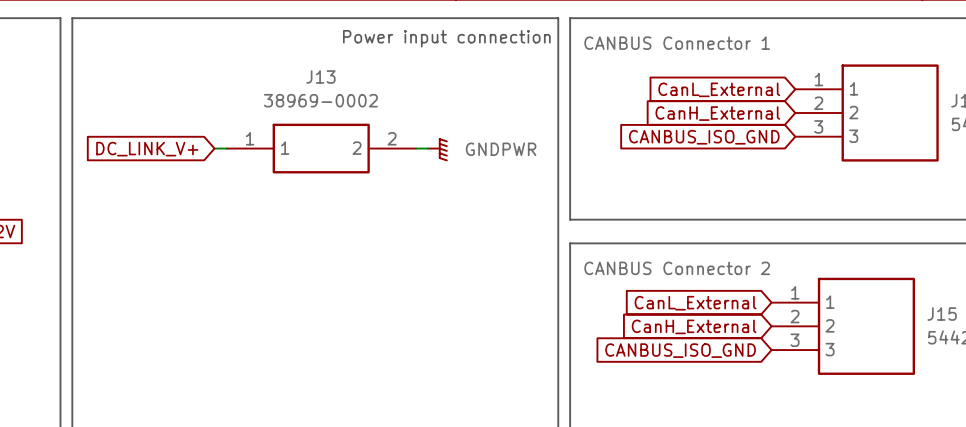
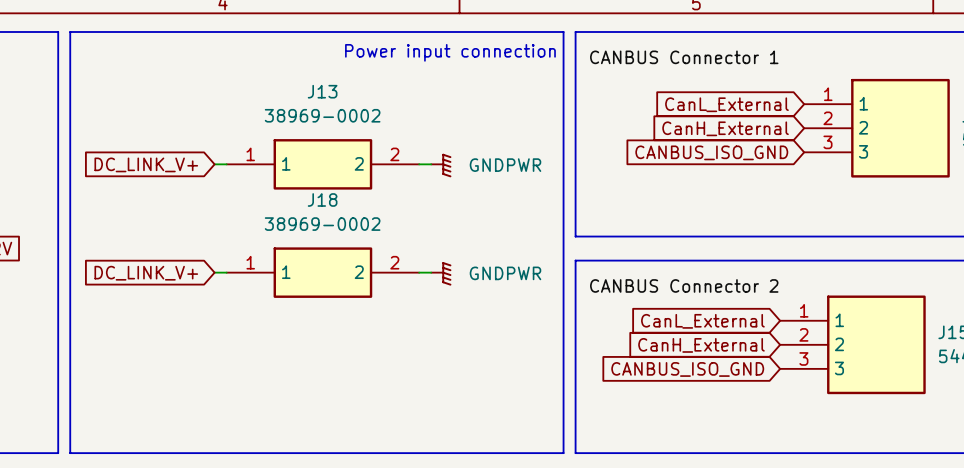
global label: none -> DC_LINK_V+ (146, 273)
wire: none -> (214, 272) (226, 272)
J18: none -> 38969-0002 (322, 272)
wire: none -> (419, 272) (431, 272)
power symbol: none -> GNDPWR (441, 273)

